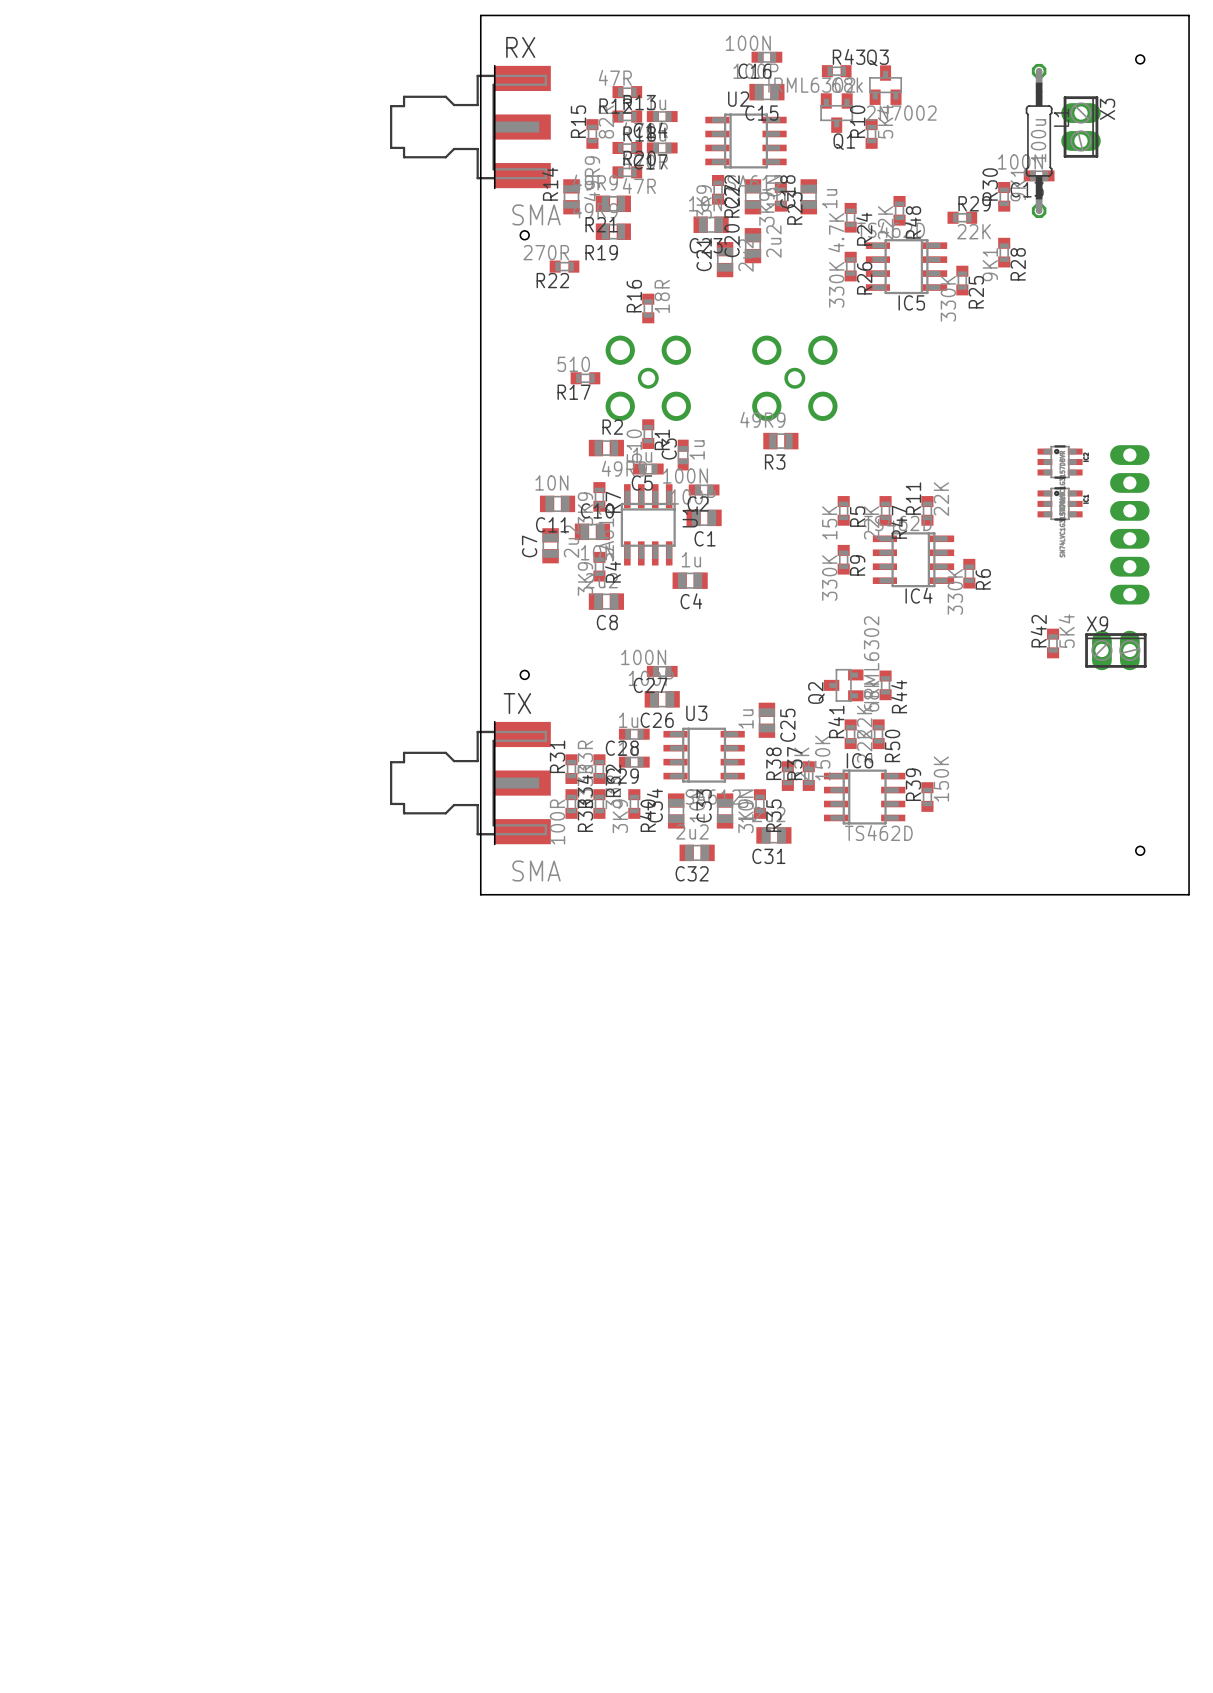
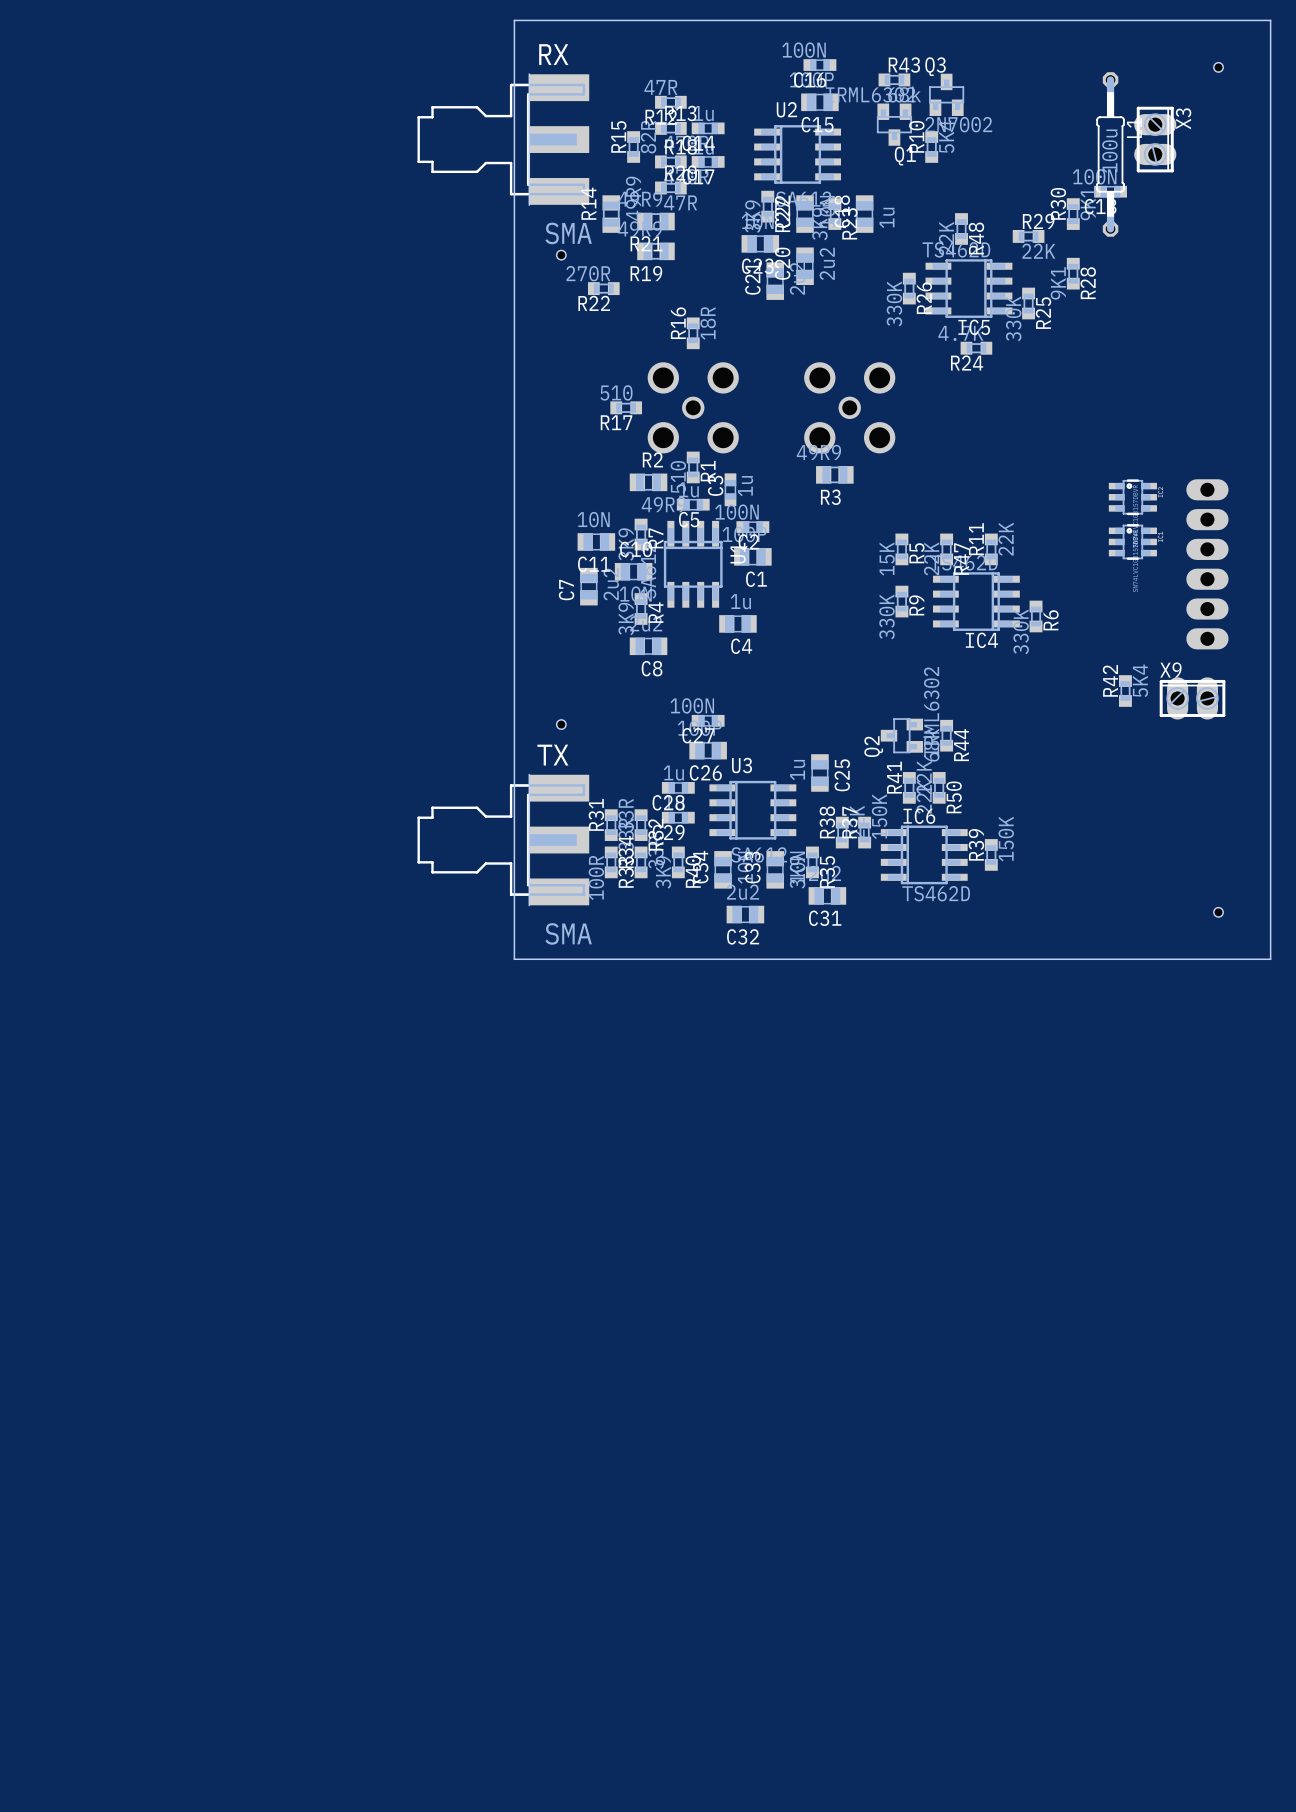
R24 rotation: 0° (850, 217) -> 90° clockwise (976, 348)
R24 position: (850, 217) -> (976, 348)

